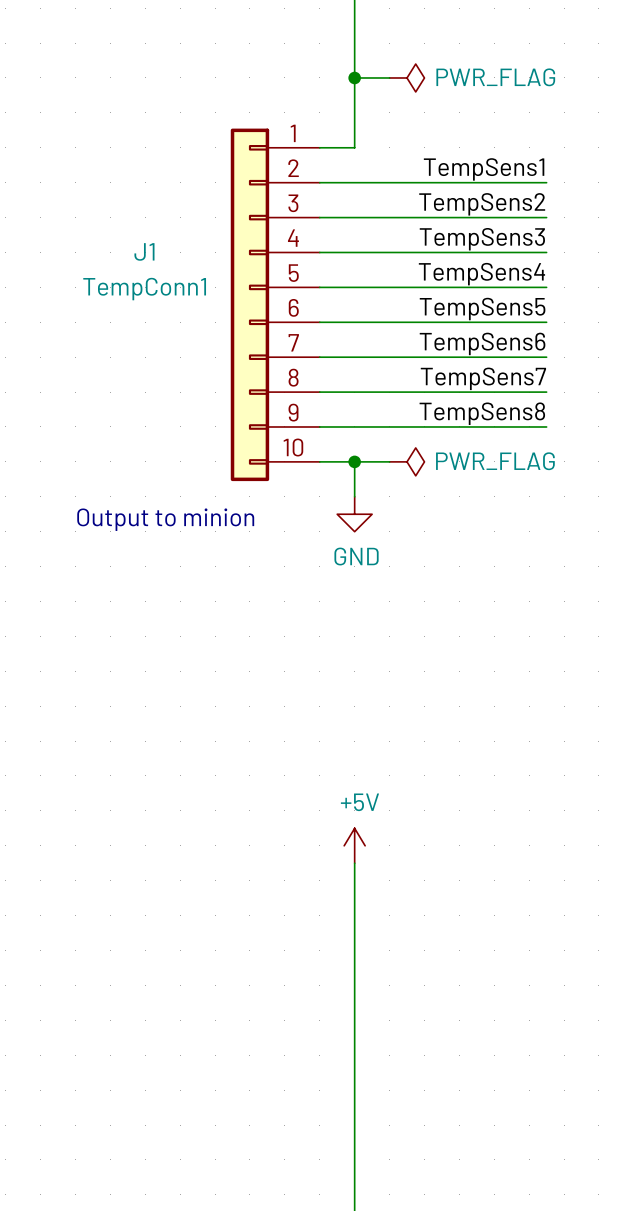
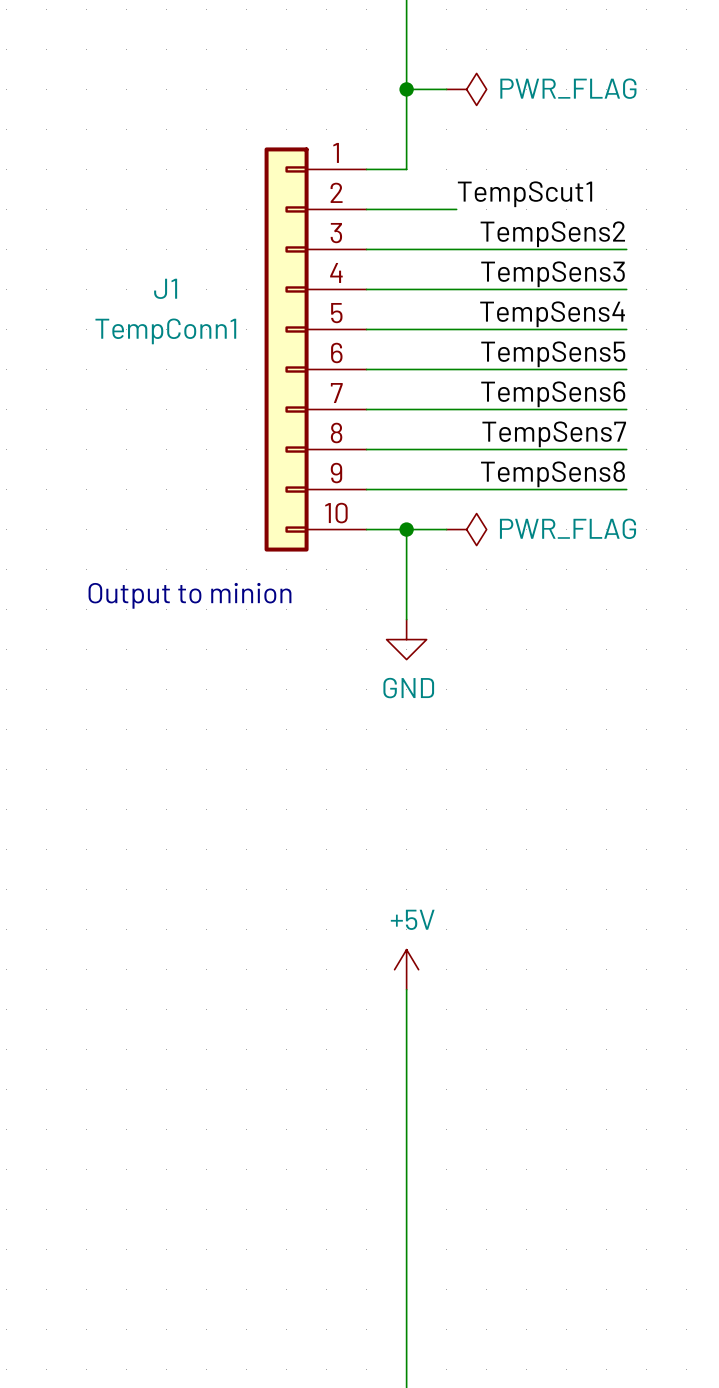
label: TempSens1 (484, 169) -> TempScut1 (525, 194)
wire: (398, 182) (546, 182) -> none
wire: none -> (406, 569) (406, 619)
power symbol position: GND (354, 514) -> GND (406, 639)

